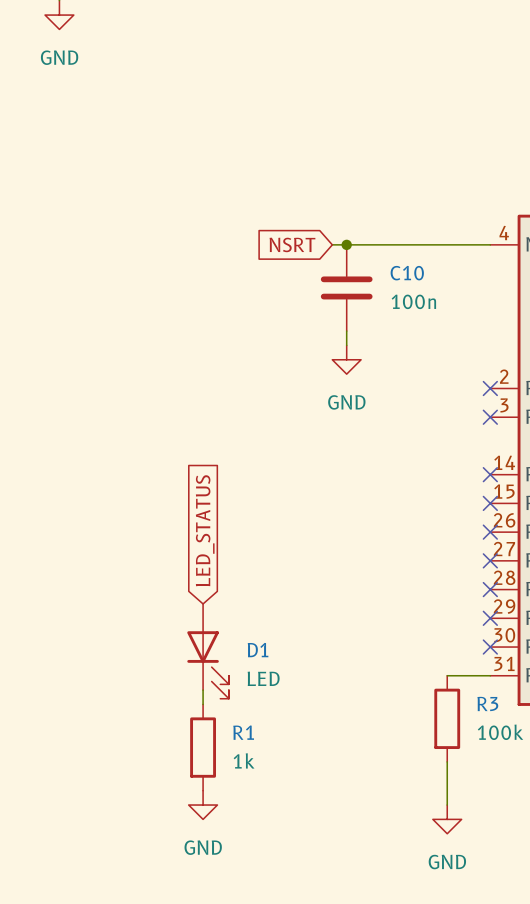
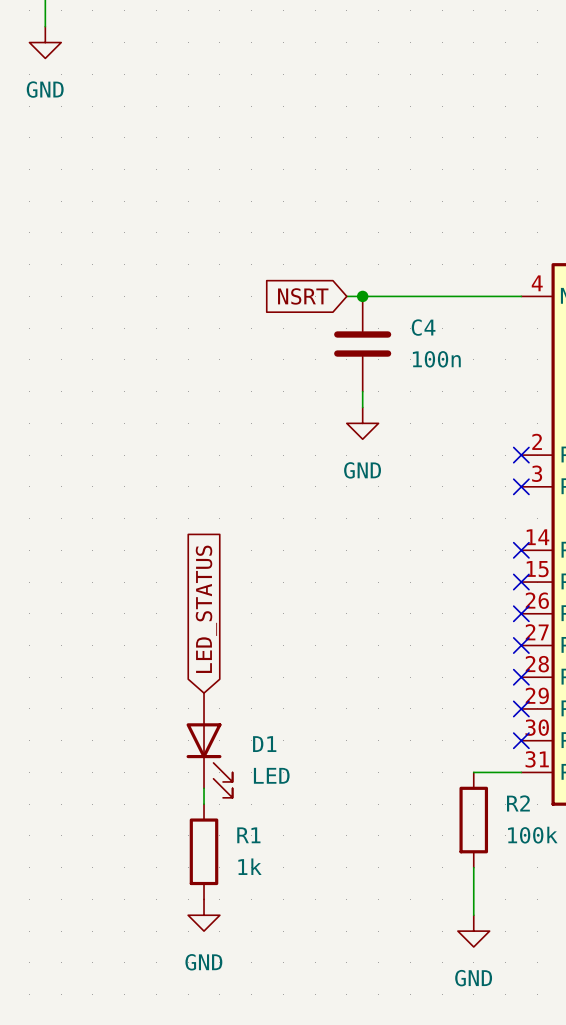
C10 name: C10 (407, 273) -> C4 (423, 327)
R3 name: R3 (487, 703) -> R2 (518, 803)

